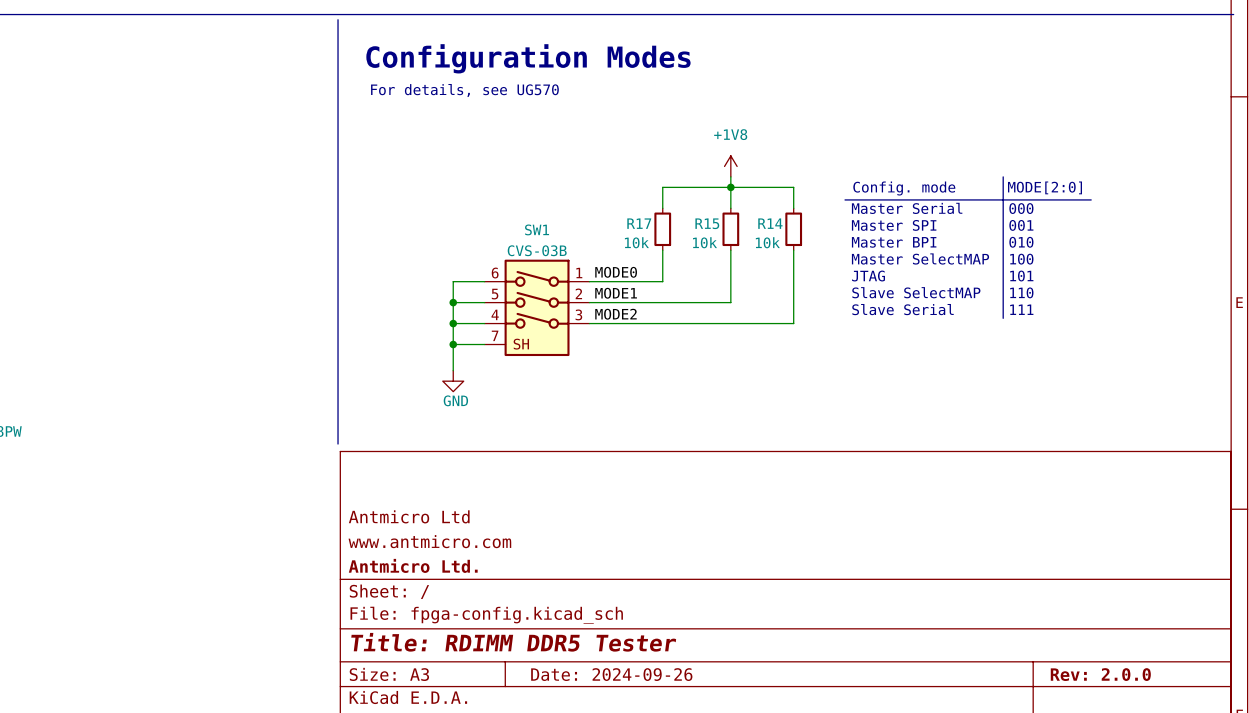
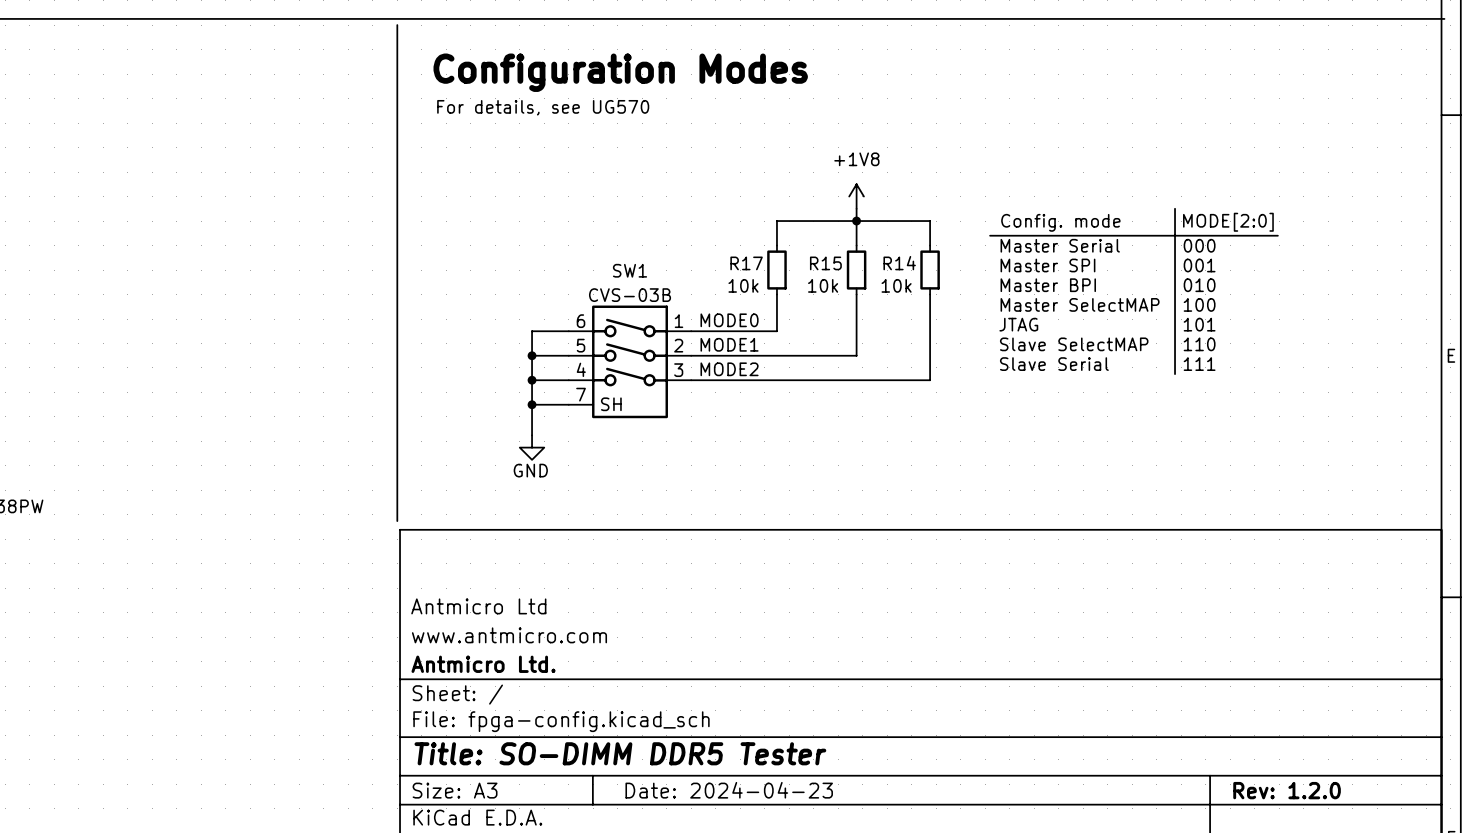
title block: Title: RDIMM DDR5 Tester (513, 642) -> Title: SO-DIMM DDR5 Tester (620, 753)
title block: Date: 2024-09-26 (611, 674) -> Date: 2024-04-23 (729, 790)
title block: Rev: 2.0.0 (1100, 674) -> Rev: 1.2.0 (1287, 790)

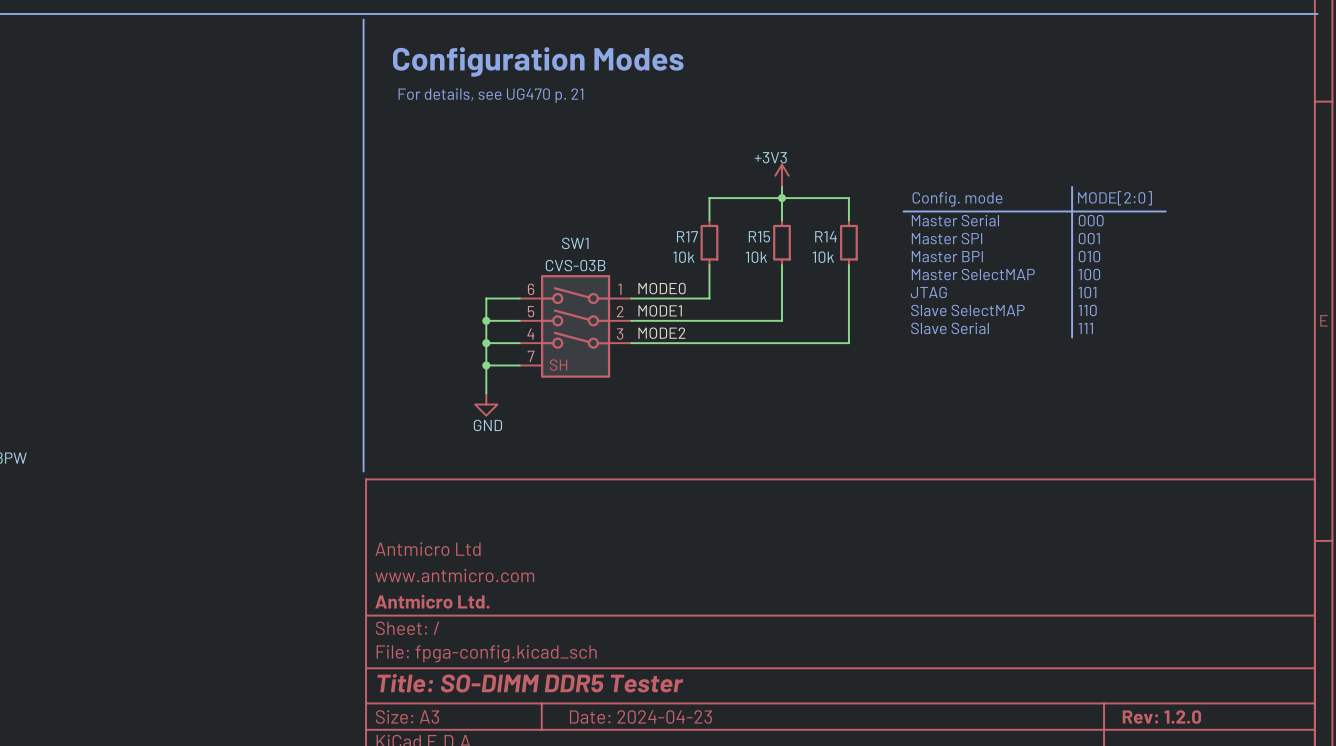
text: For details, see UG570 (543, 107) -> For details, see UG470 p. 21 (490, 95)
power symbol: +1V8 (856, 196) -> +3V3 (781, 175)

